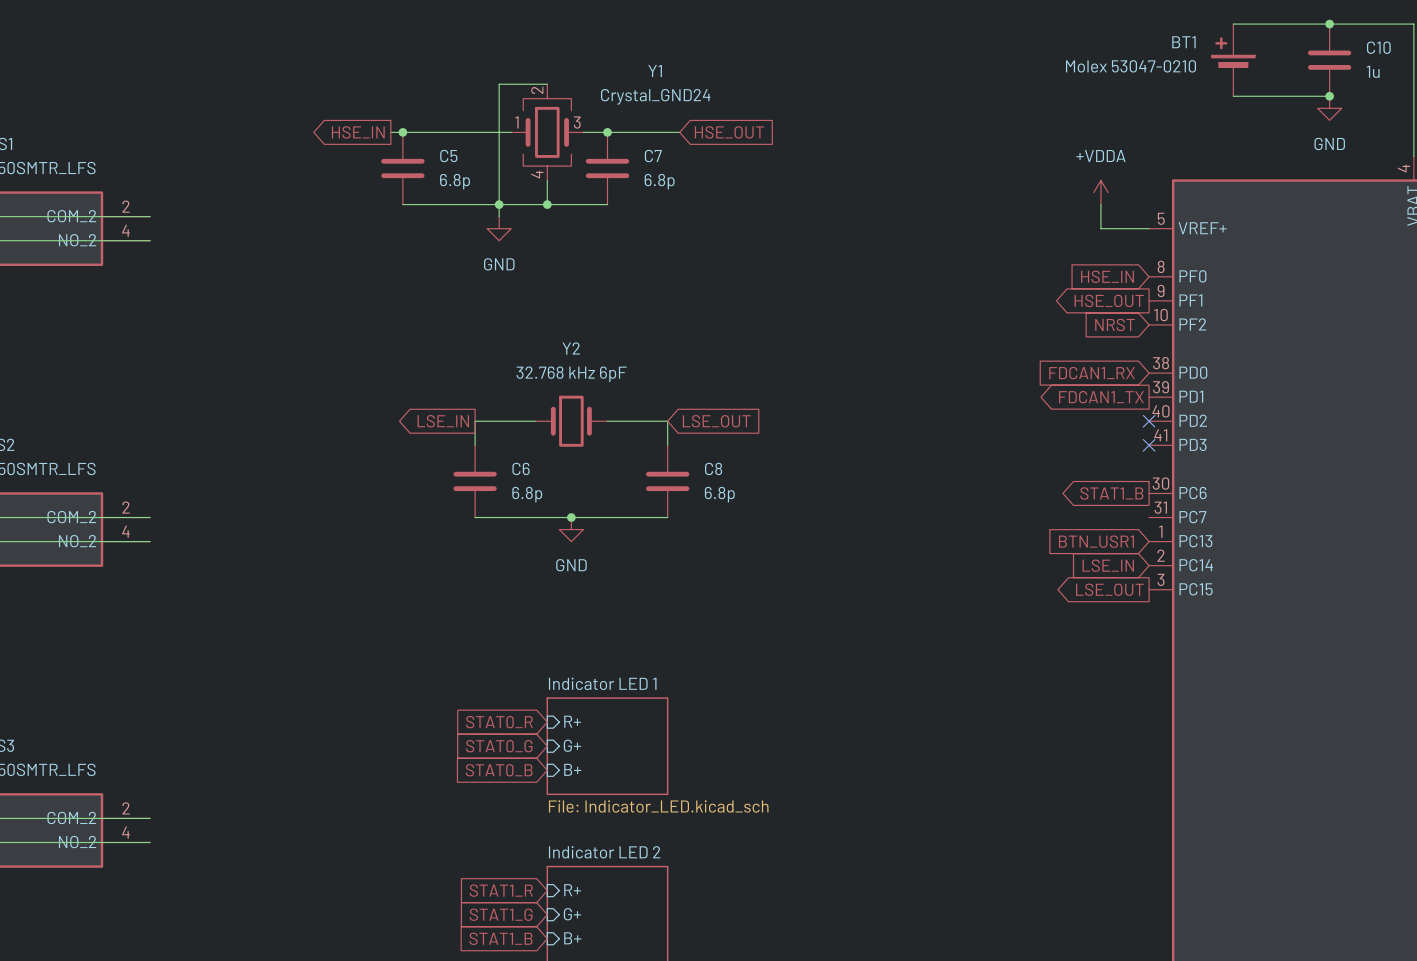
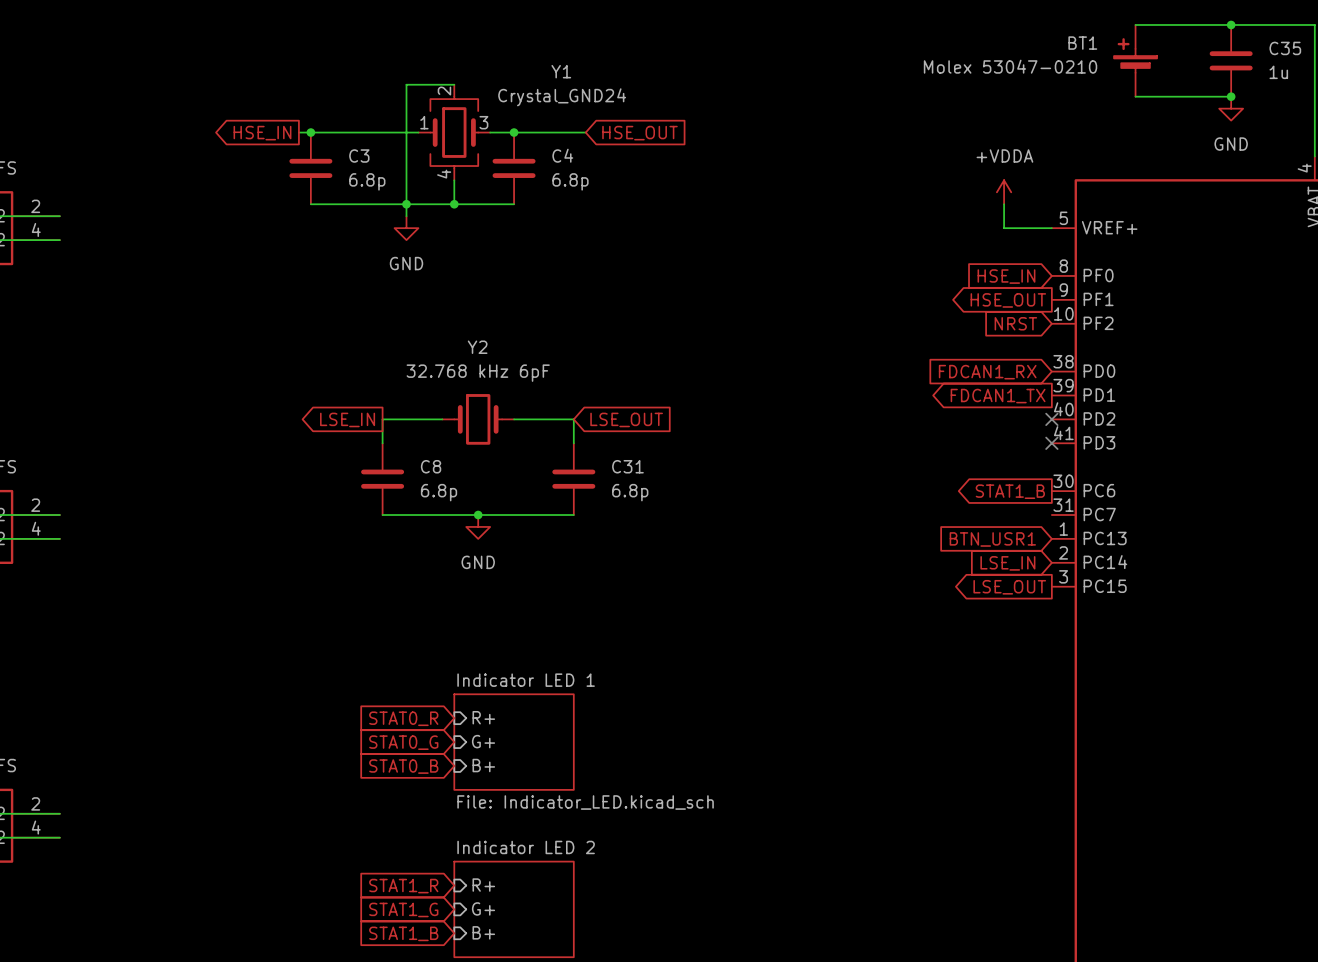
C10 name: C10 (1378, 47) -> C35 (1285, 48)
C5 name: C5 (448, 156) -> C3 (359, 156)
C7 name: C7 (653, 156) -> C4 (562, 155)
C6 name: C6 (521, 468) -> C8 (431, 466)
C8 name: C8 (713, 468) -> C31 (627, 466)

